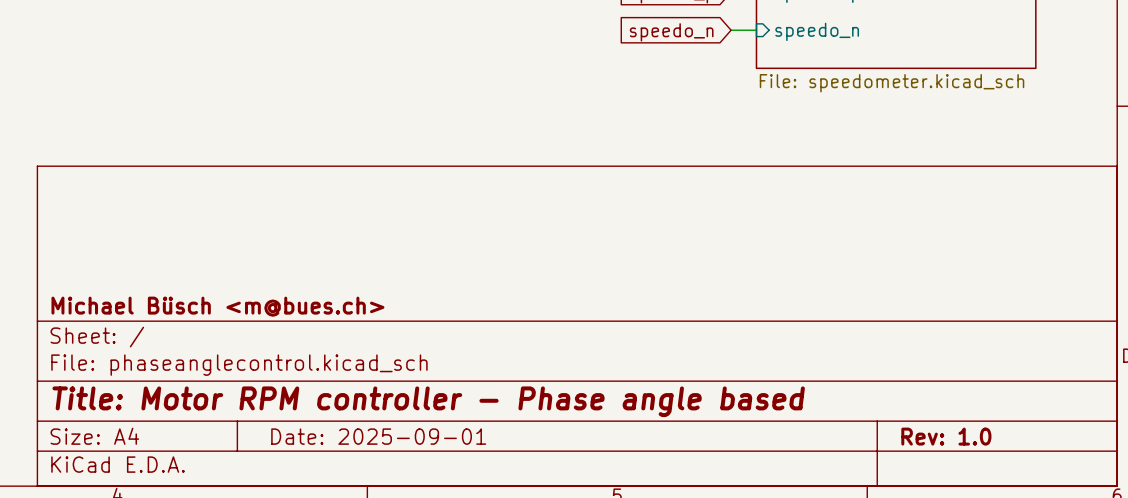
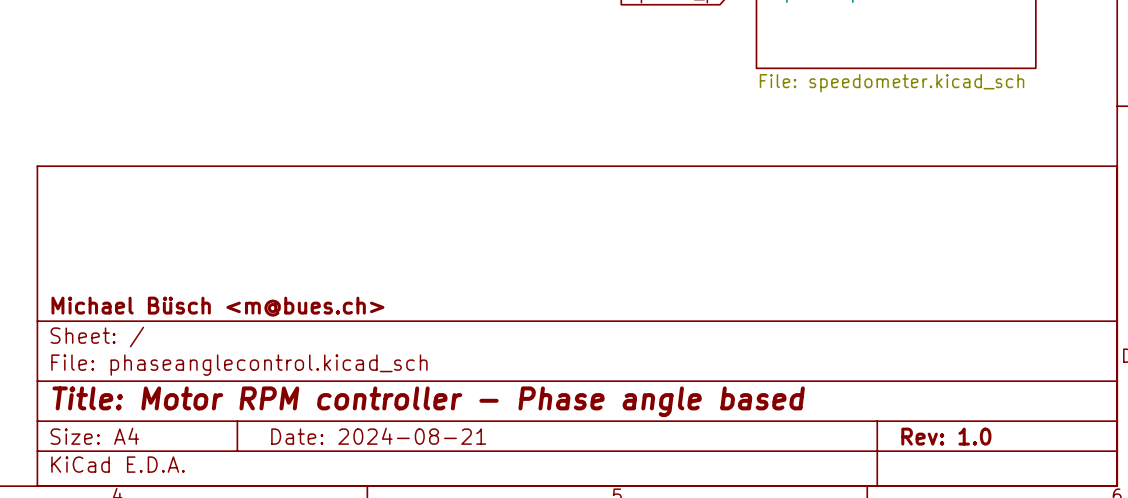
wire: (731, 30) (756, 30) -> none
sheet pin: speedo_n (817, 31) -> none
global label: speedo_n (671, 32) -> none
title block: Date: 2025-09-01 (378, 436) -> Date: 2024-08-21 (378, 436)

